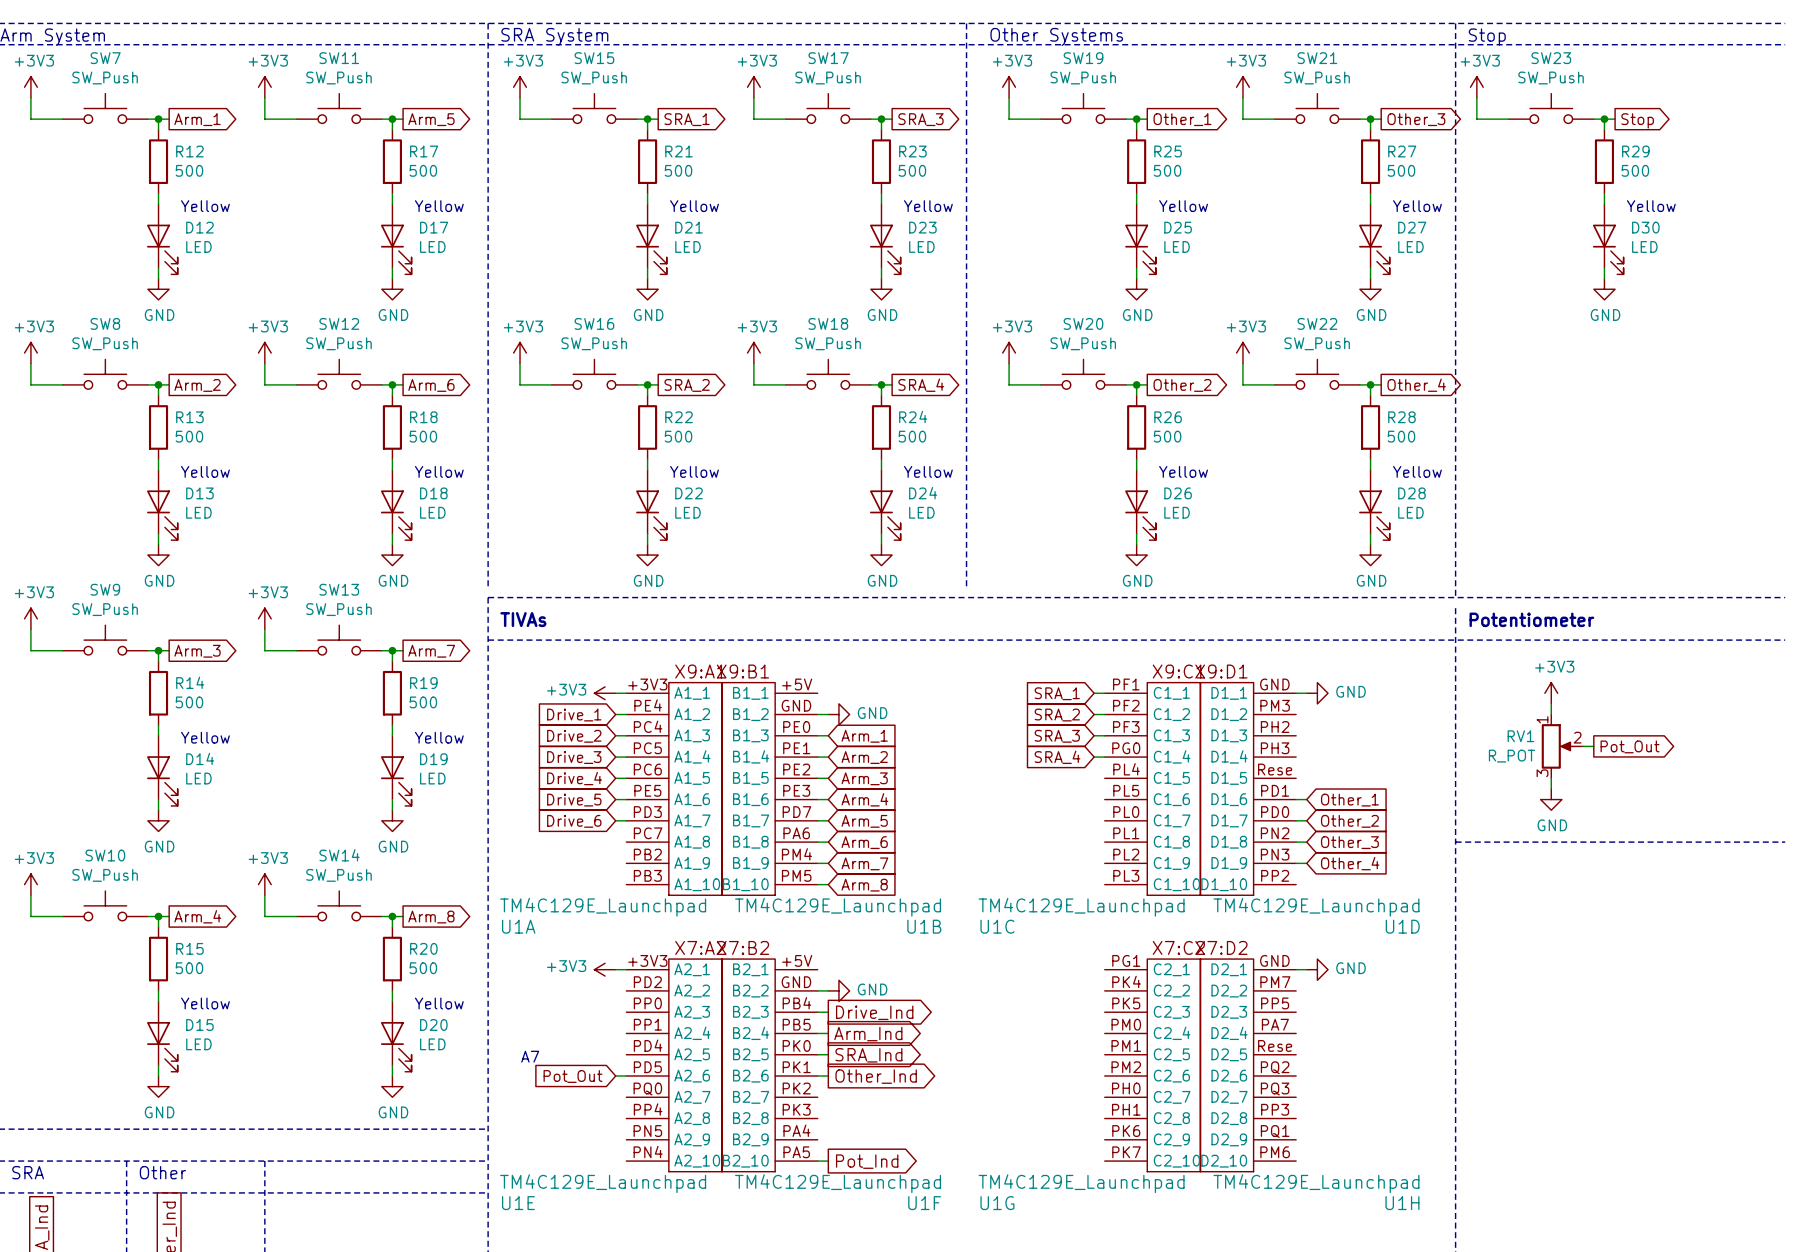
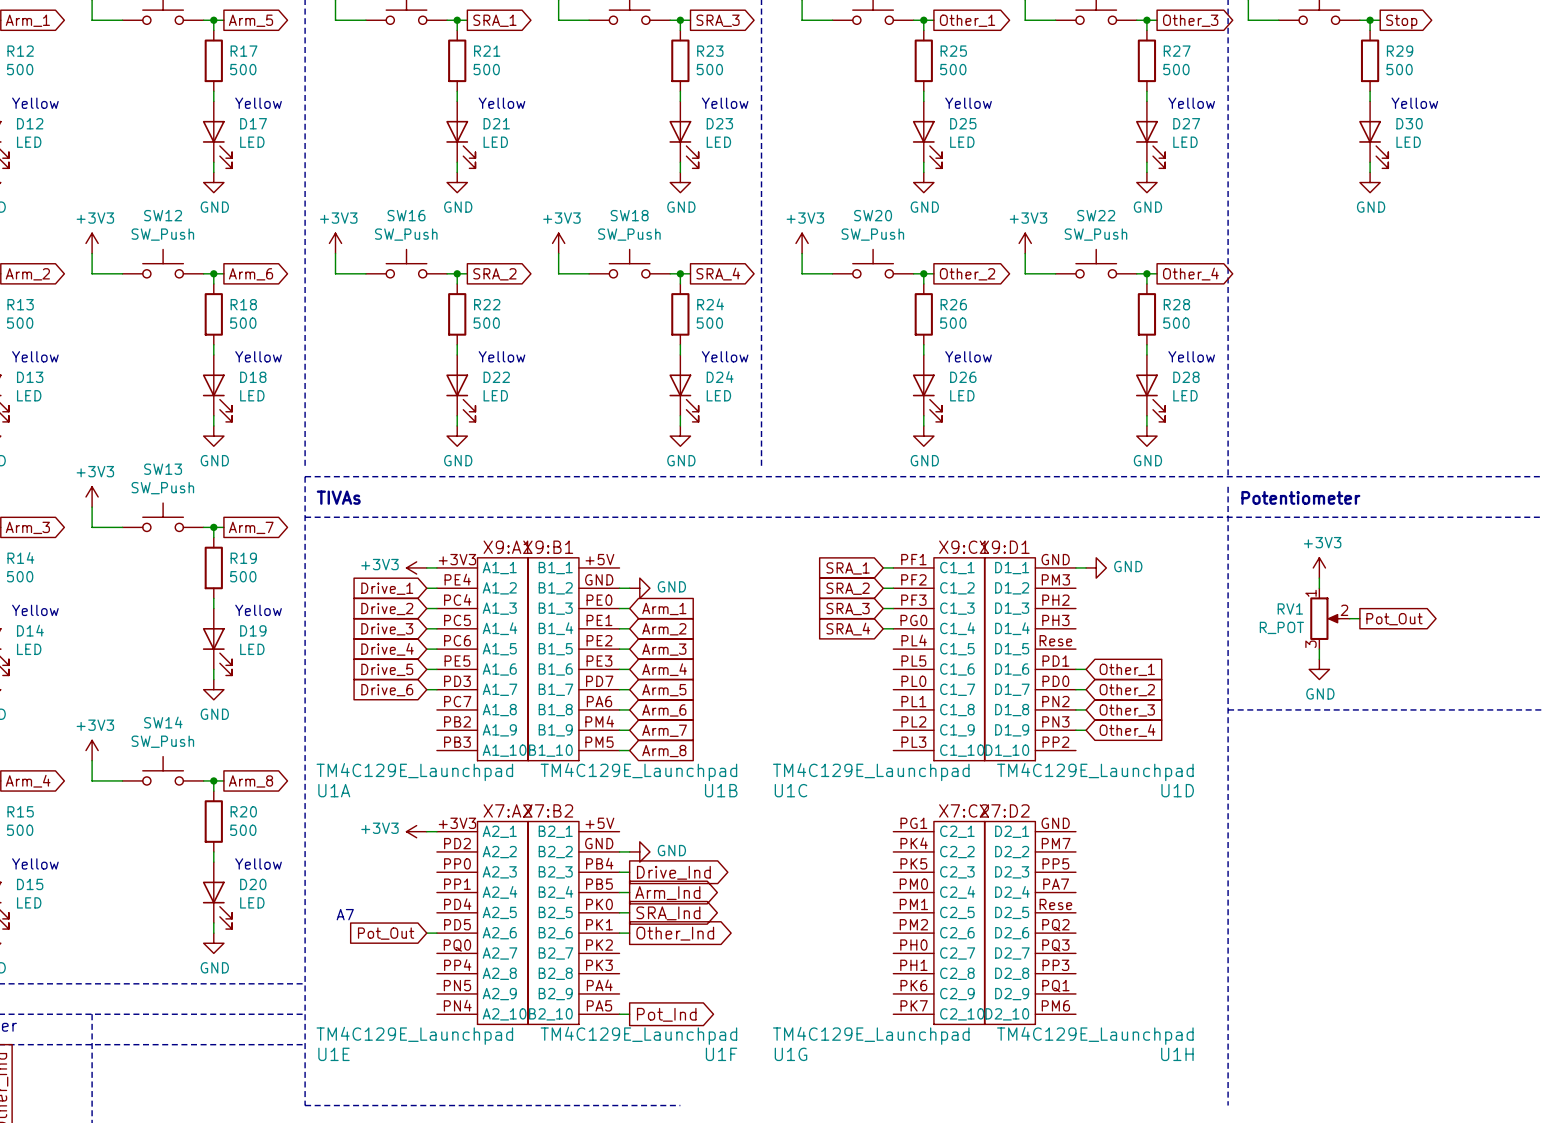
wire: (1296, 969) (1306, 969) -> none
power symbol: GND (1317, 969) -> none

